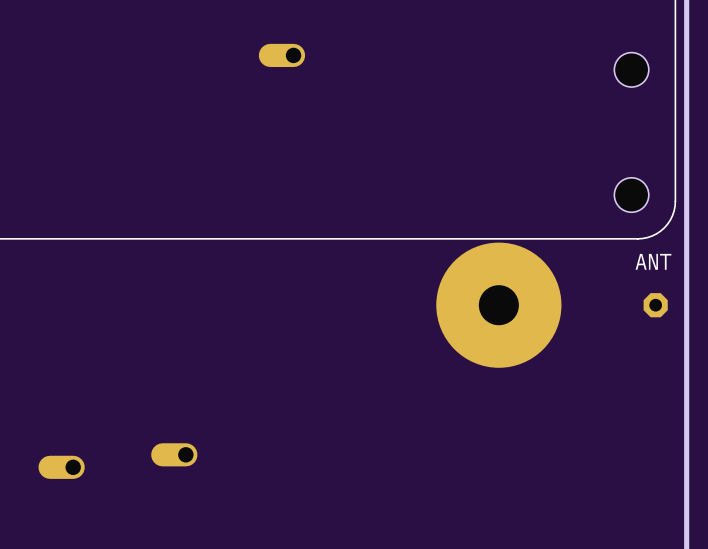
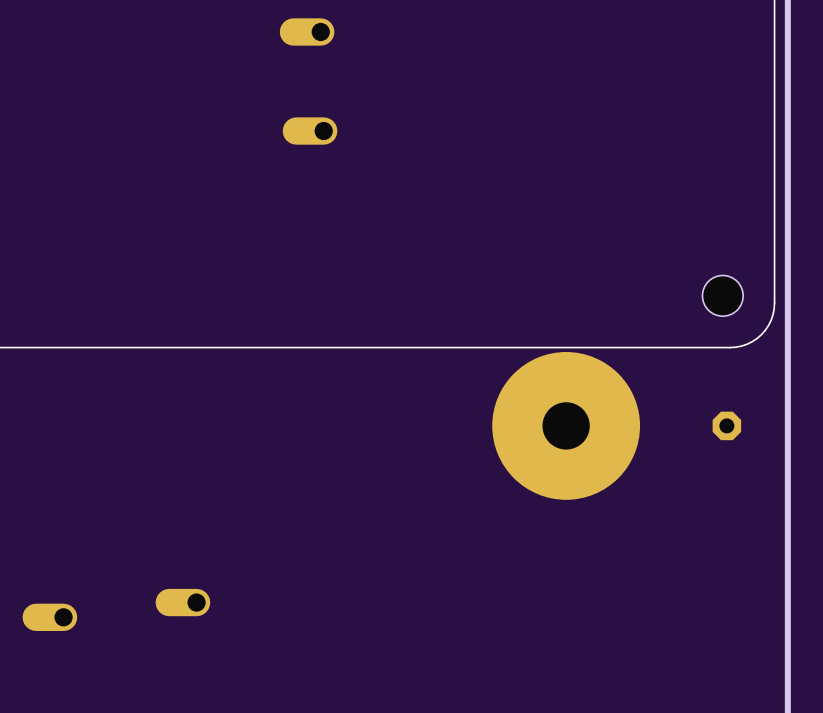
hole: (631, 69) -> none
part: none -> (726, 425)
ANT: (655, 305) -> none

